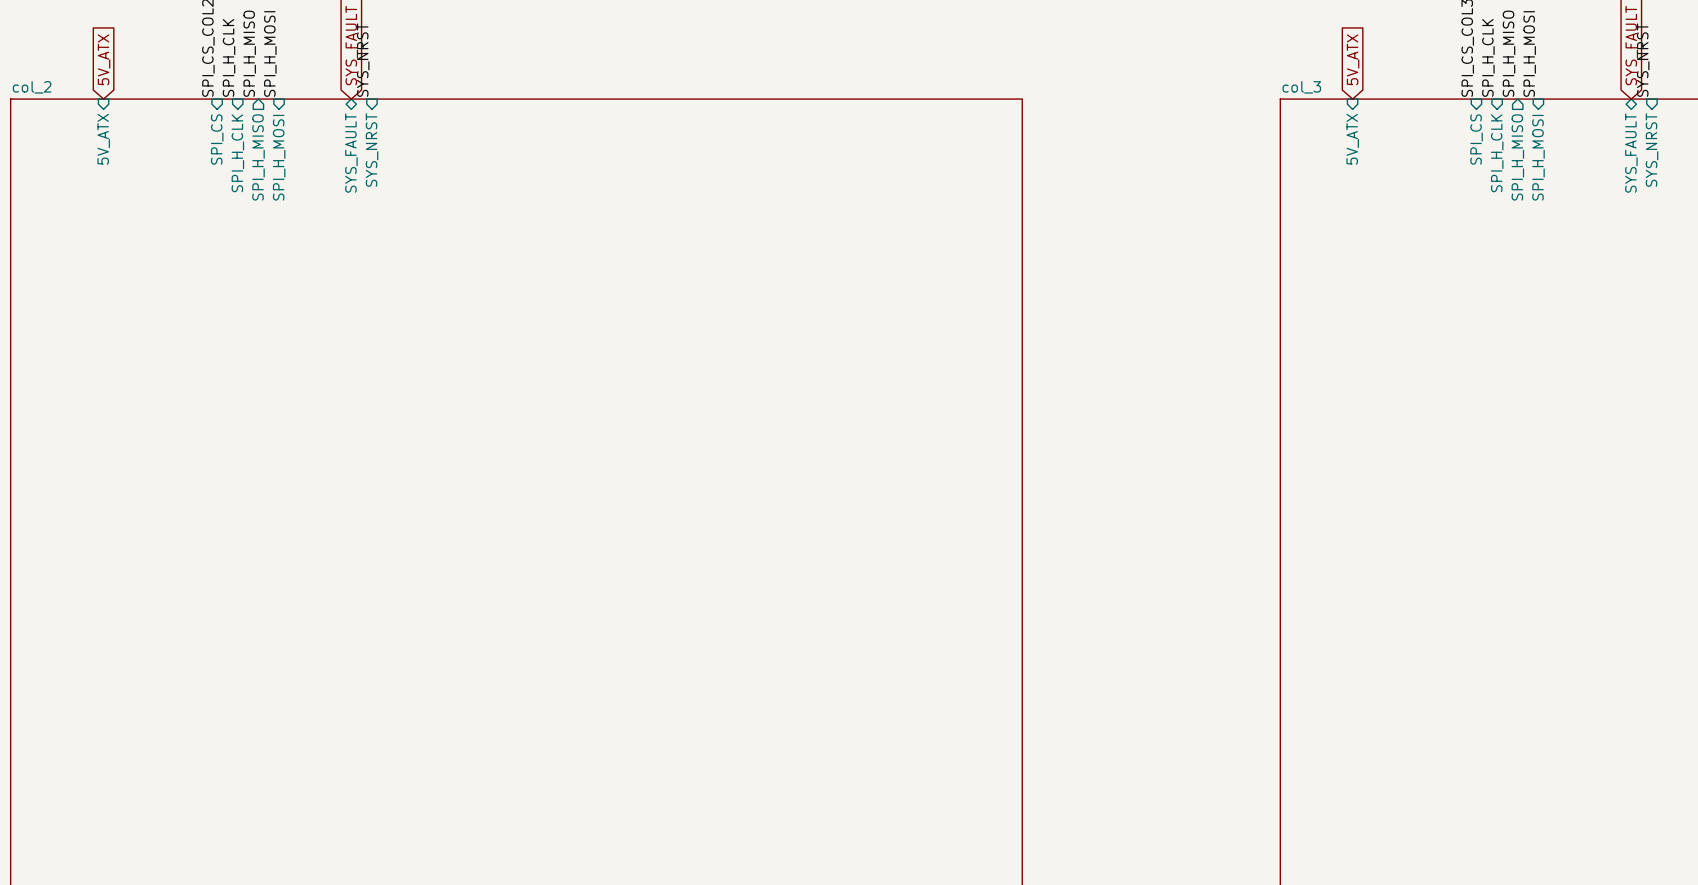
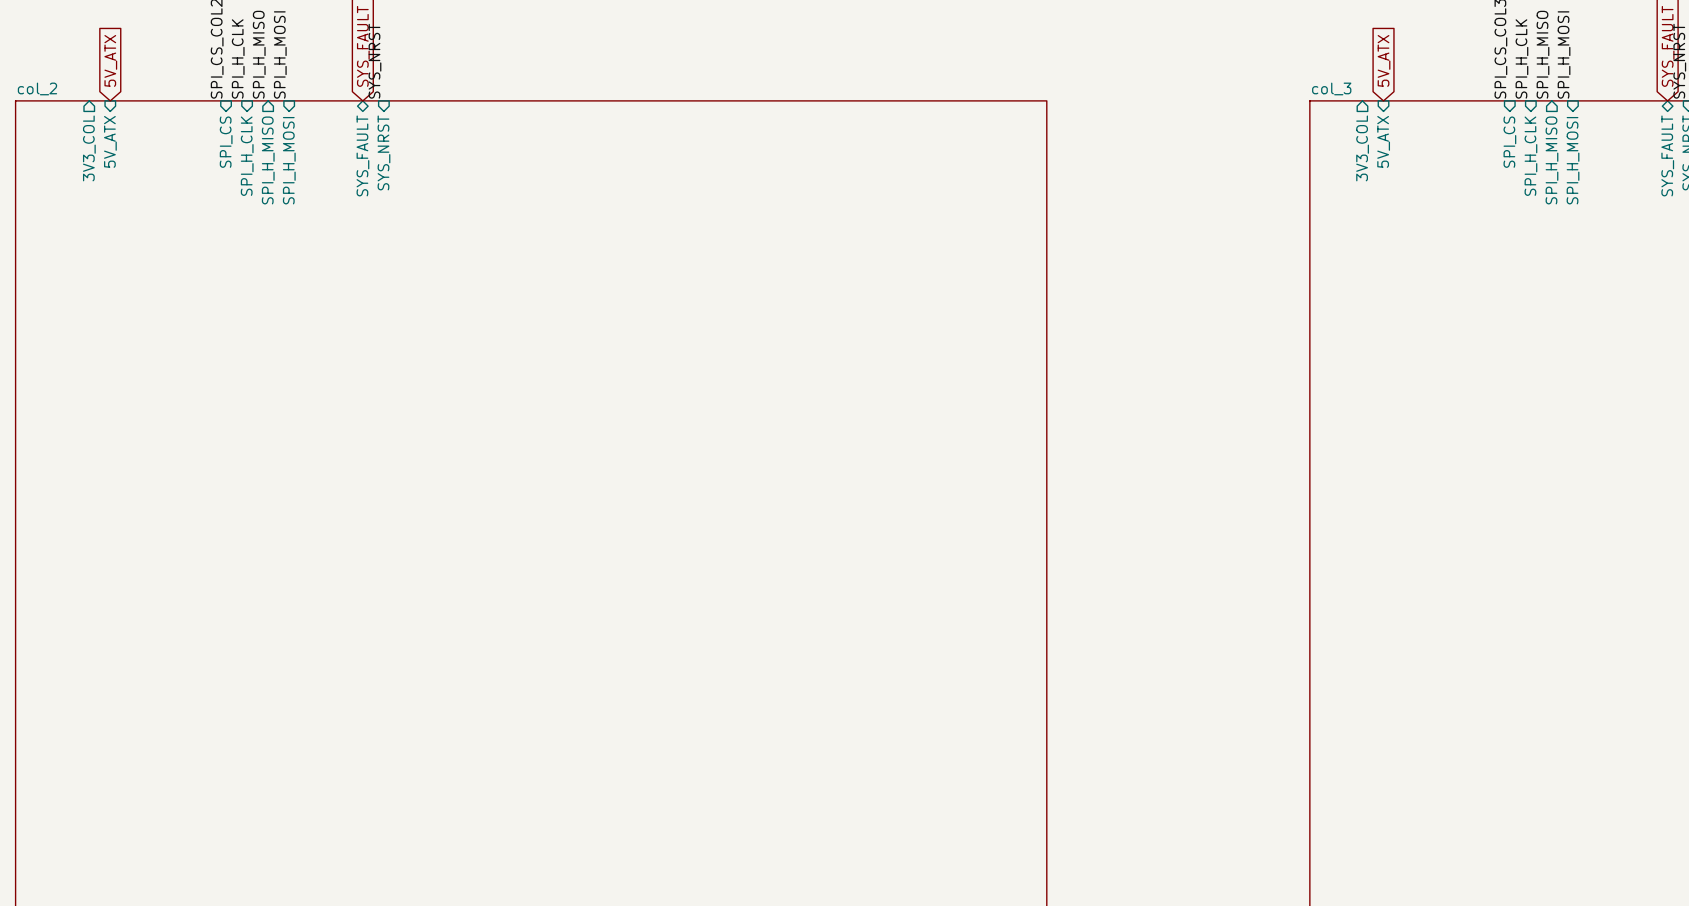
sheet pin: none -> 3V3_COL (89, 148)
sheet pin: none -> 3V3_COL (1362, 148)

